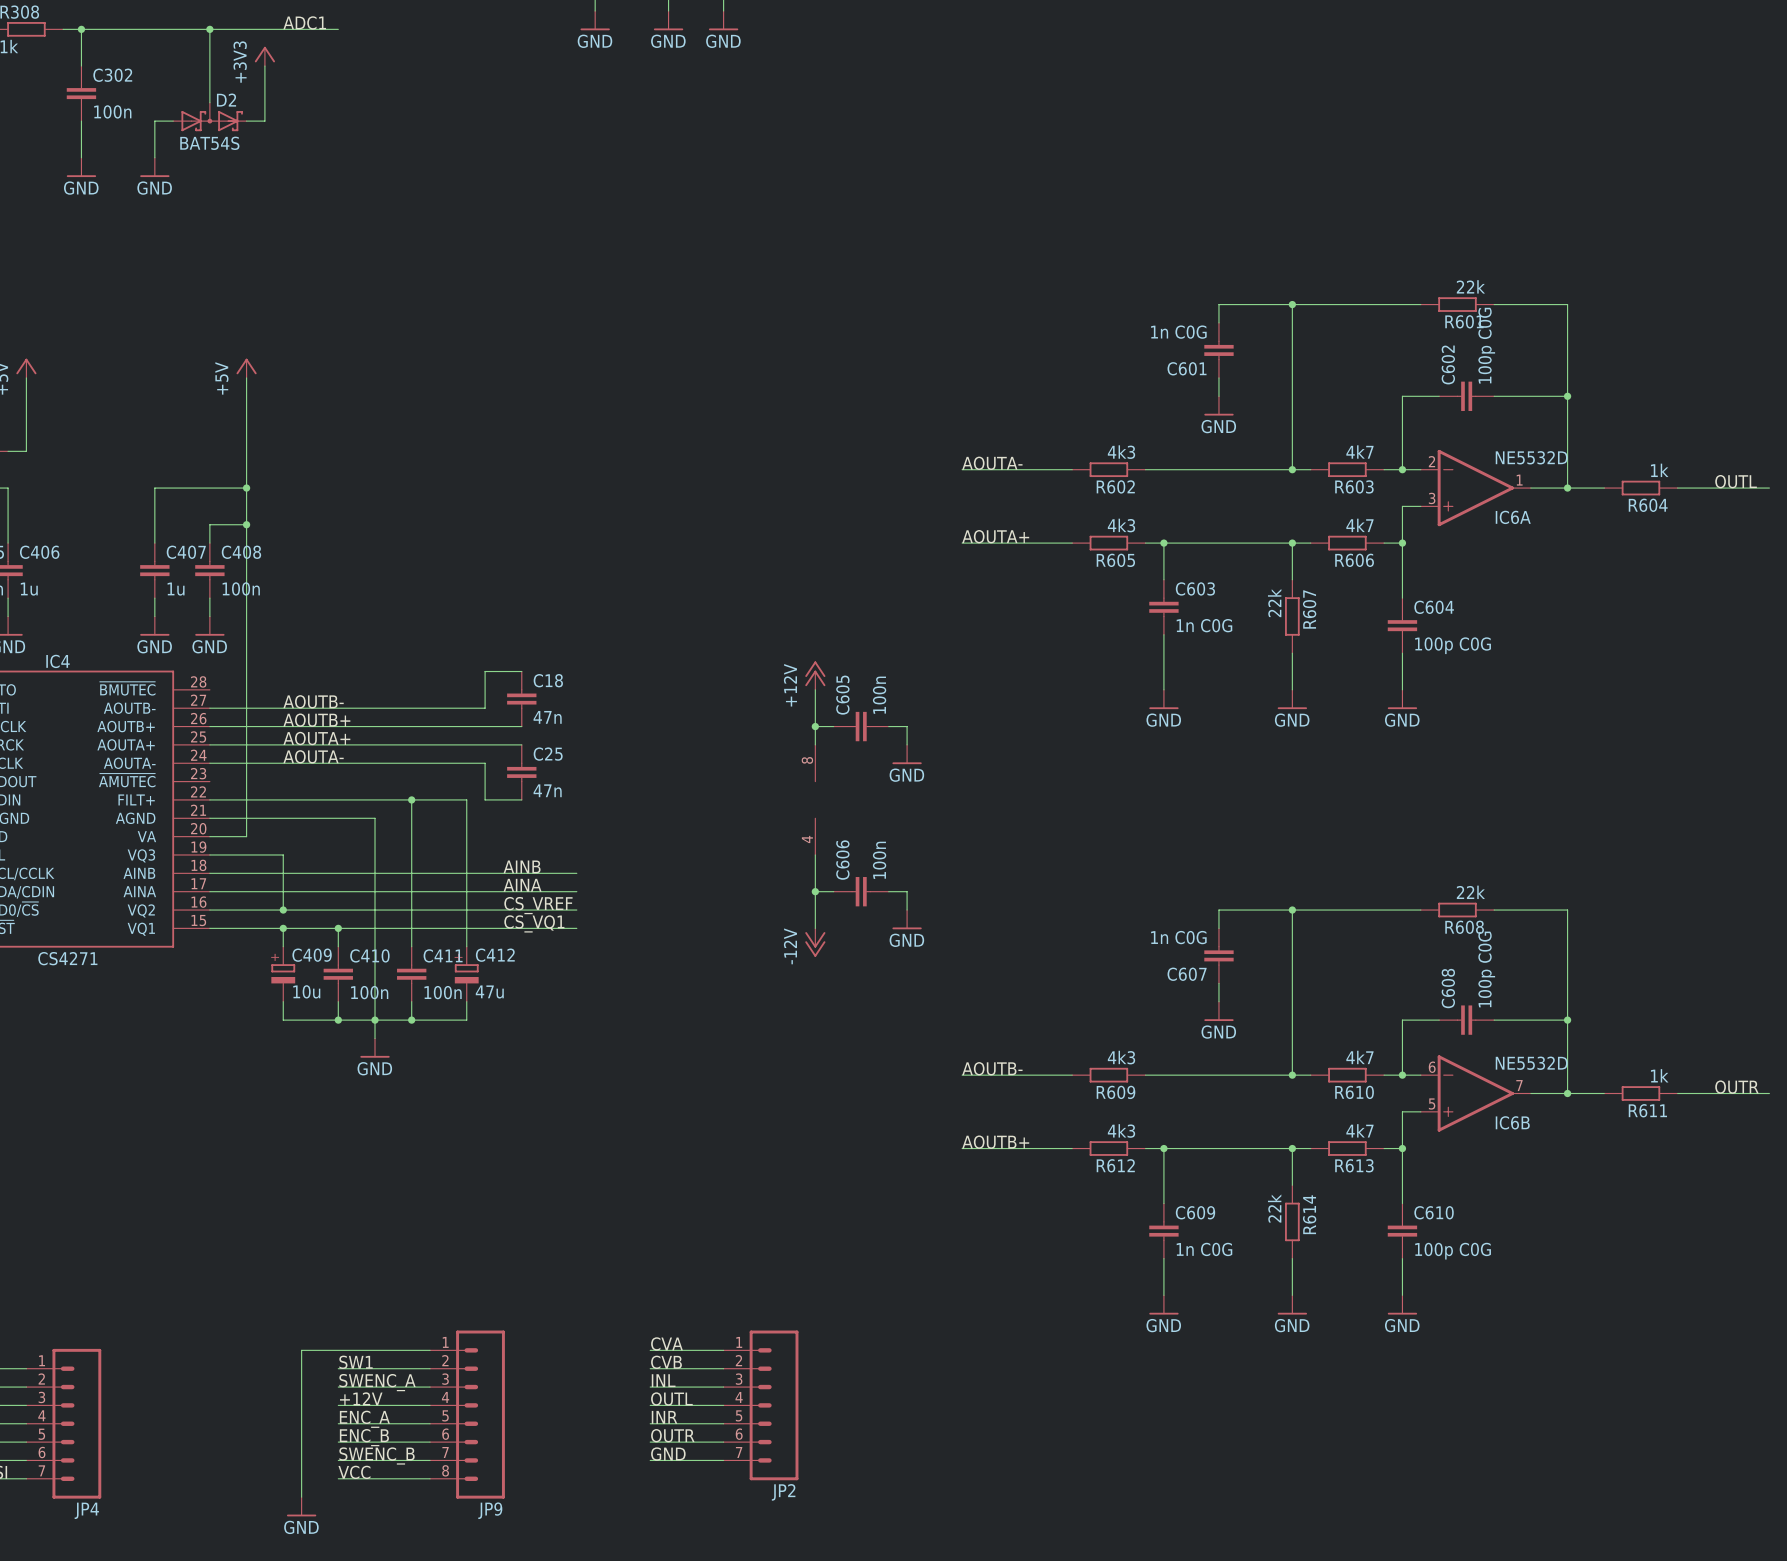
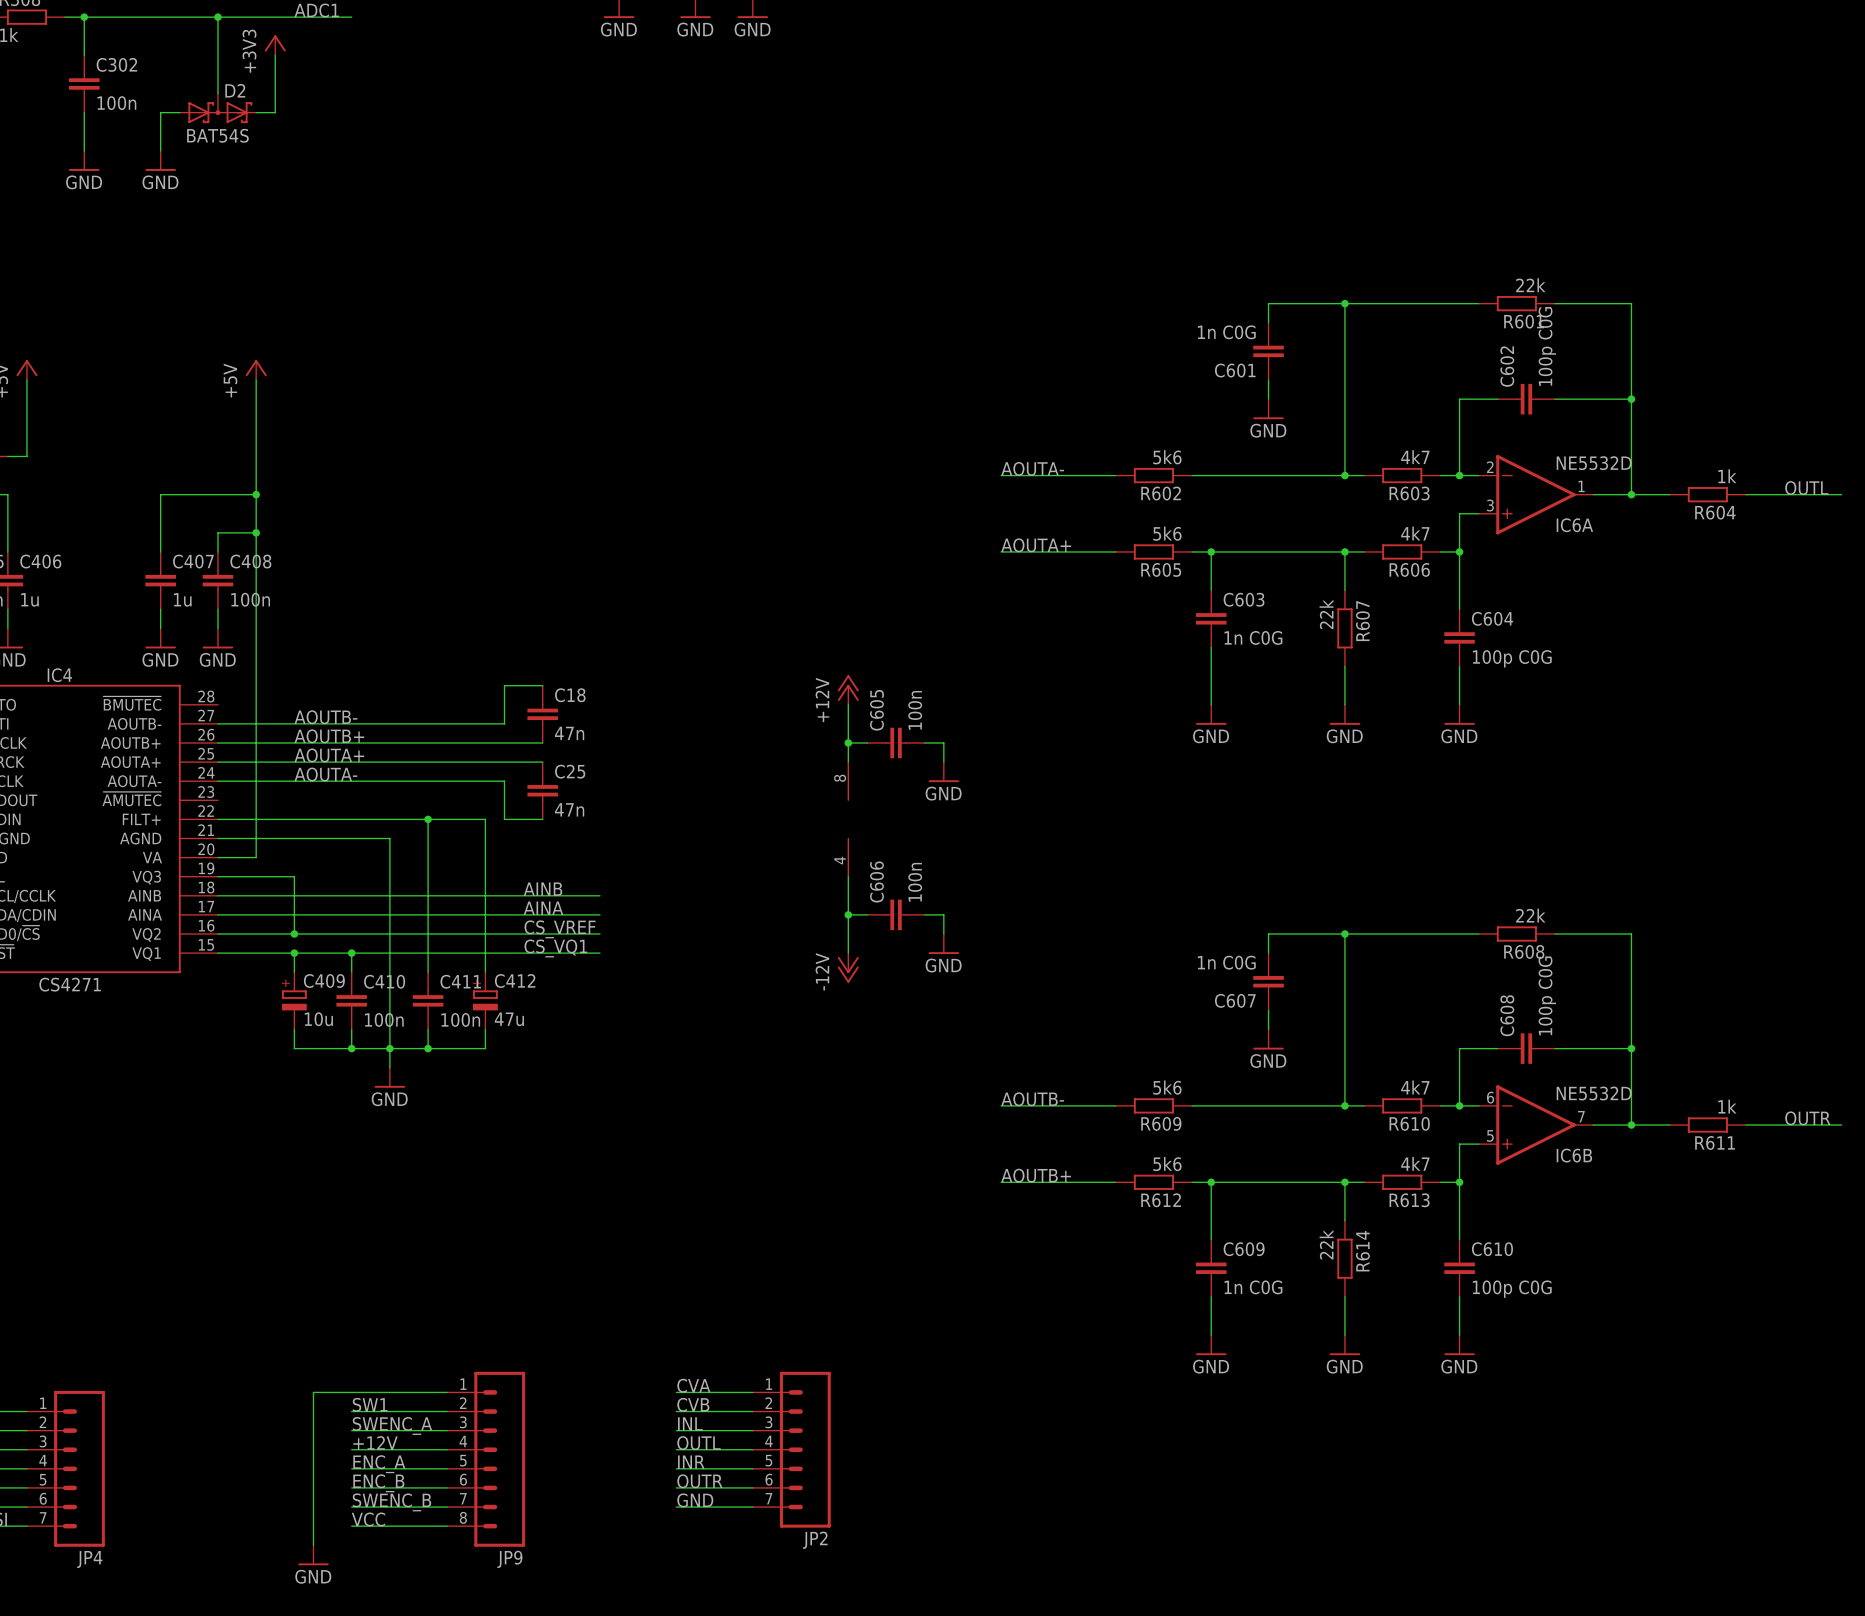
R602 value: 4k3 (1121, 452) -> 5k6 (1167, 457)
R605 value: 4k3 (1121, 525) -> 5k6 (1167, 533)
R609 value: 4k3 (1121, 1057) -> 5k6 (1167, 1087)
R612 value: 4k3 (1121, 1130) -> 5k6 (1167, 1164)

